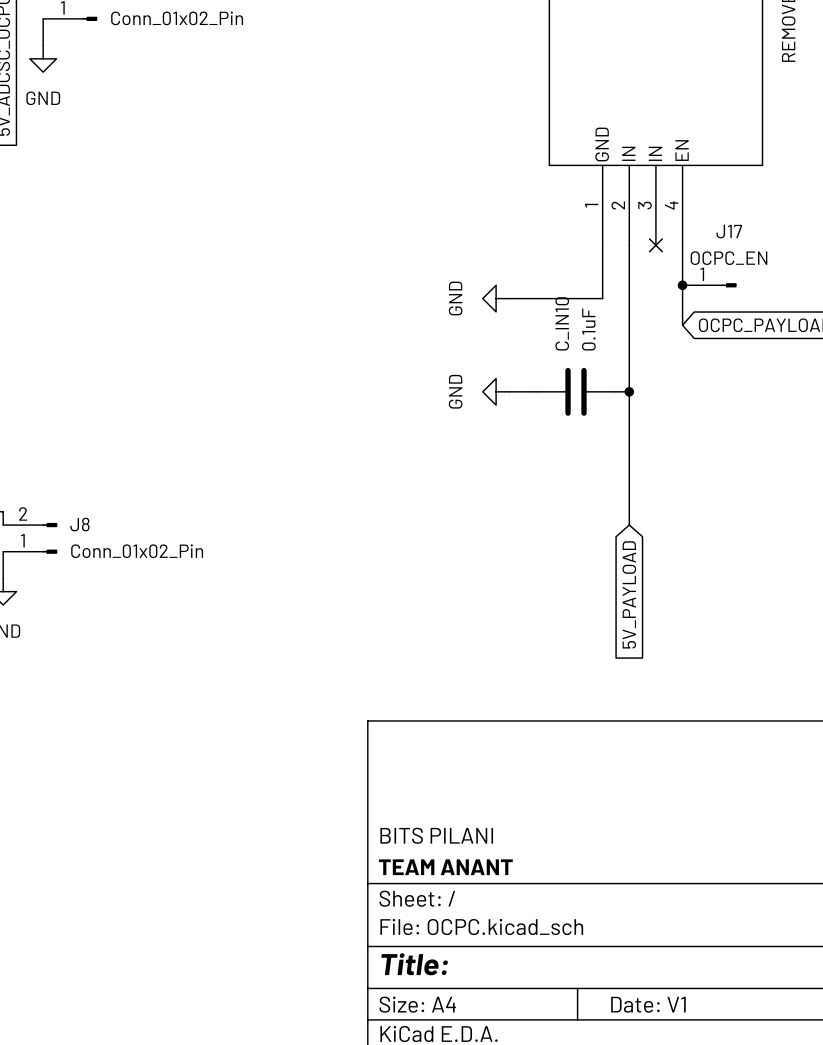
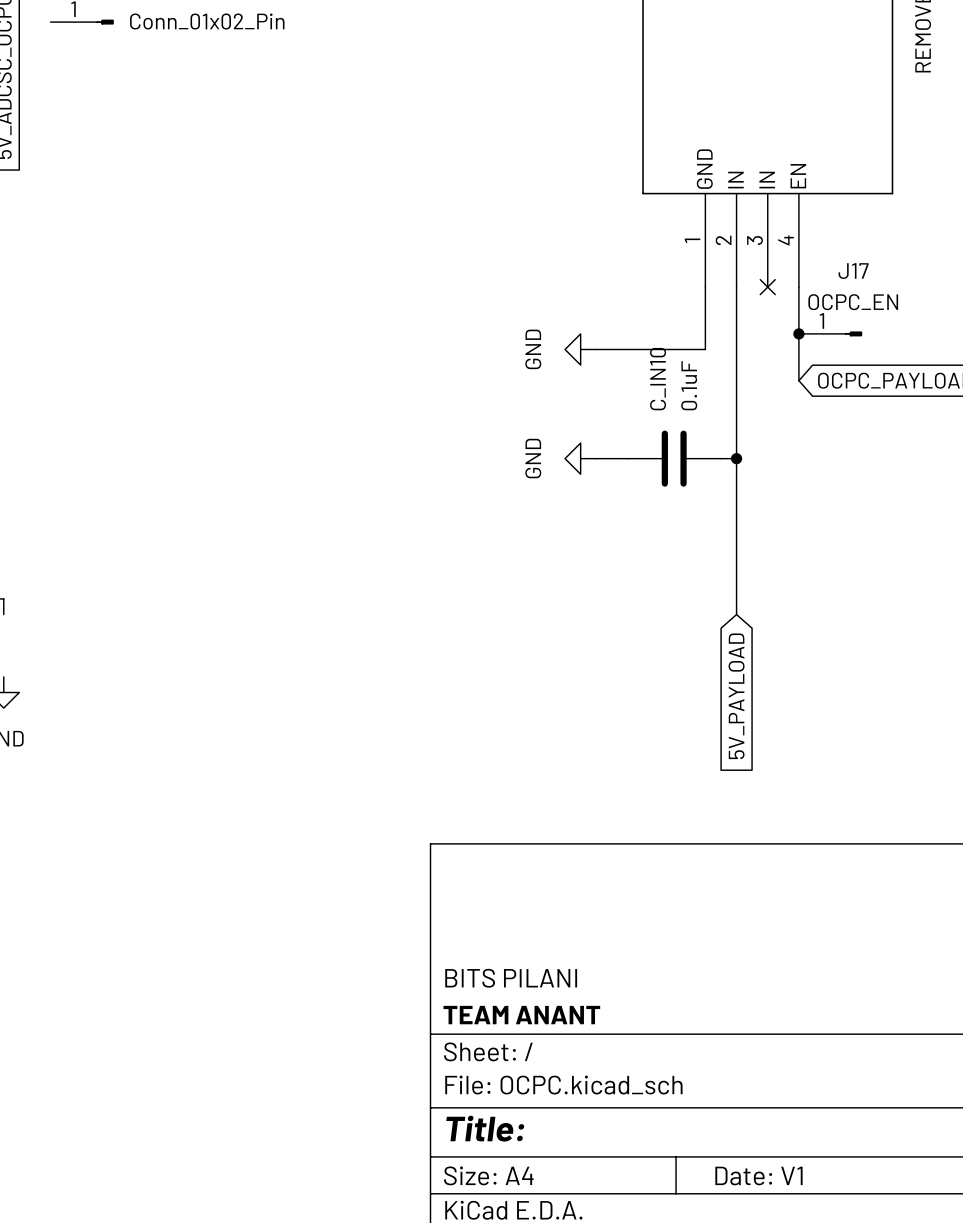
wire: (43, 18) (43, 45) -> none
power symbol: GND (43, 58) -> none
J8: Conn_01x02_Pin (30, 538) -> none
wire: (3, 551) (3, 578) -> none

